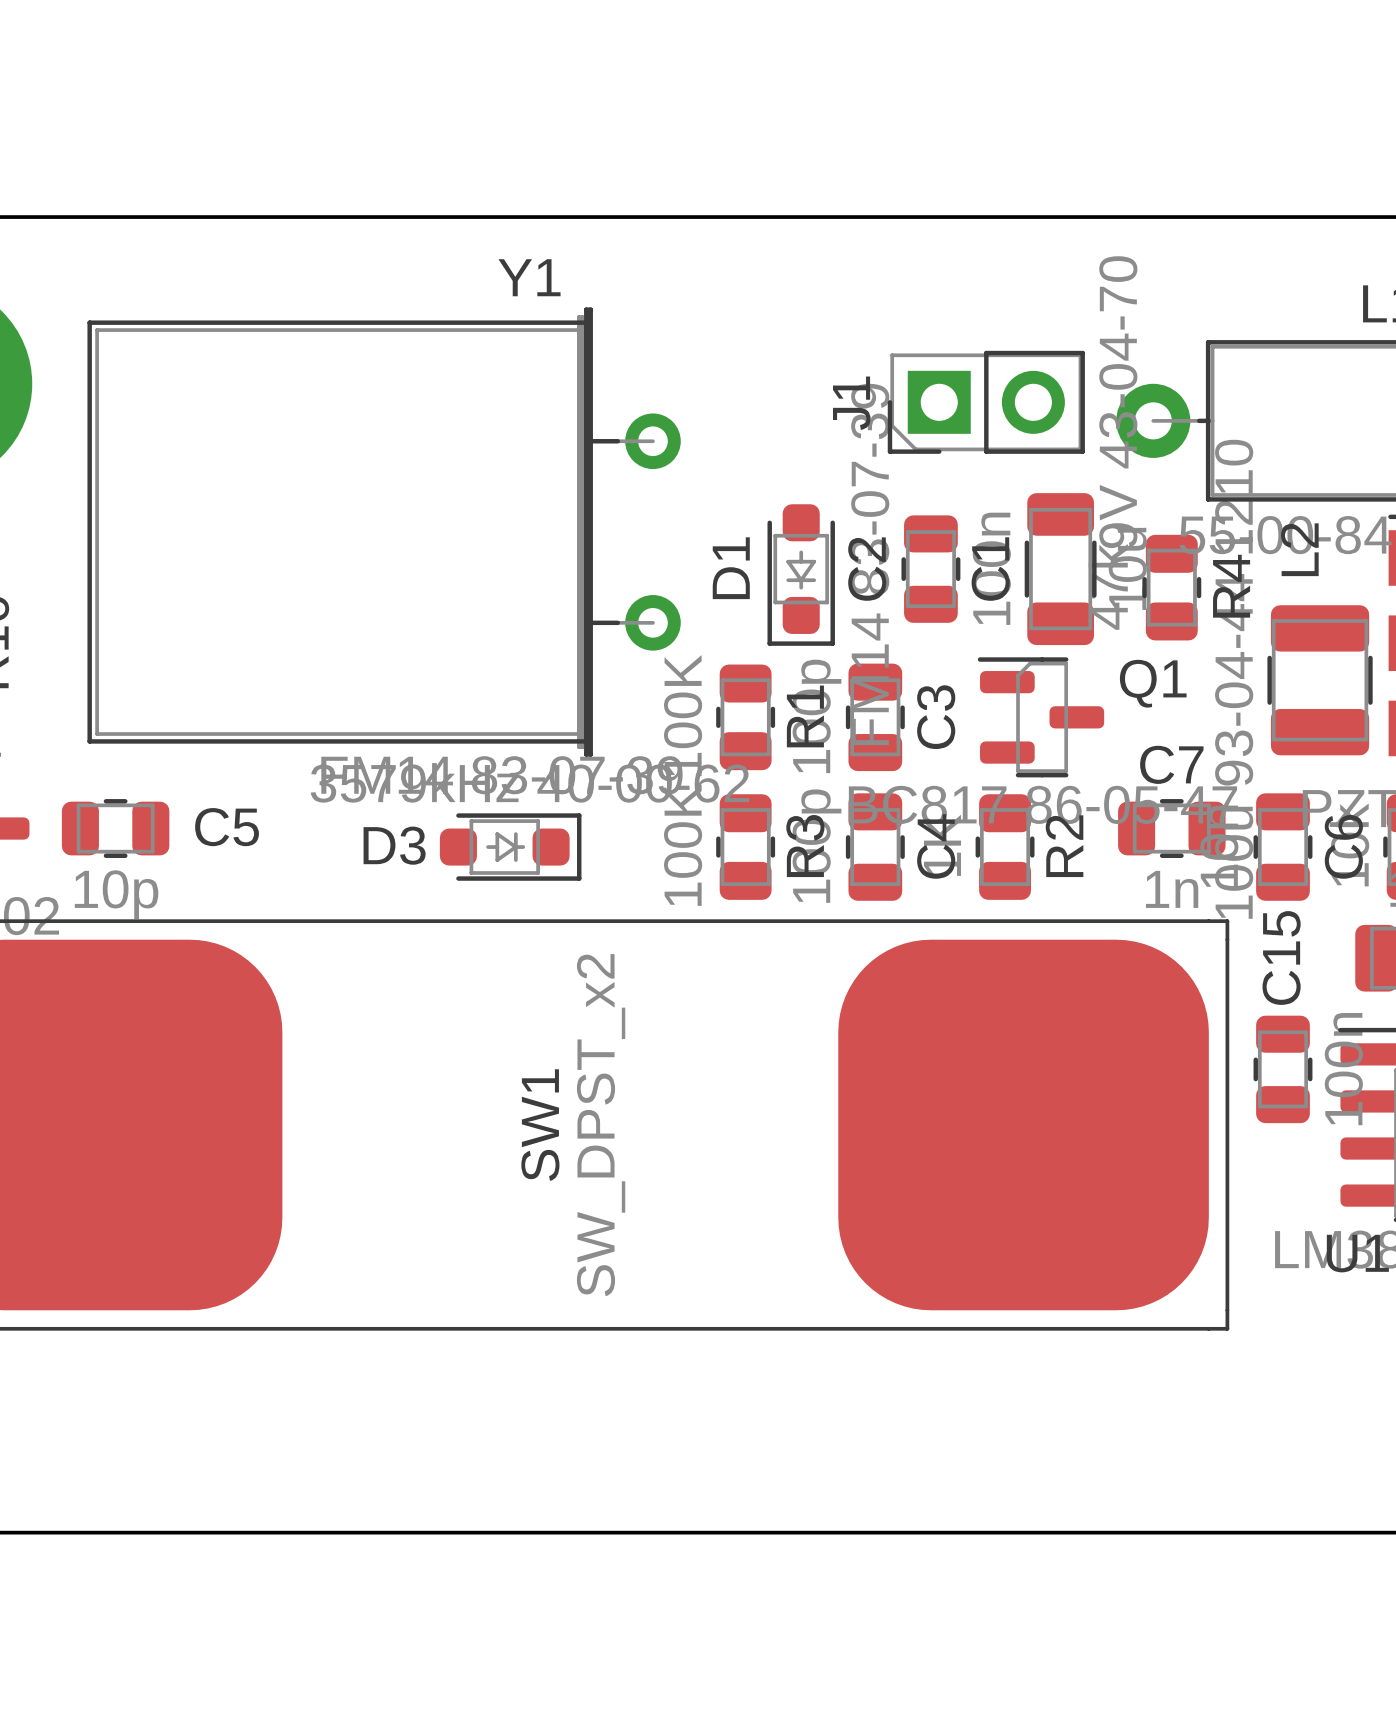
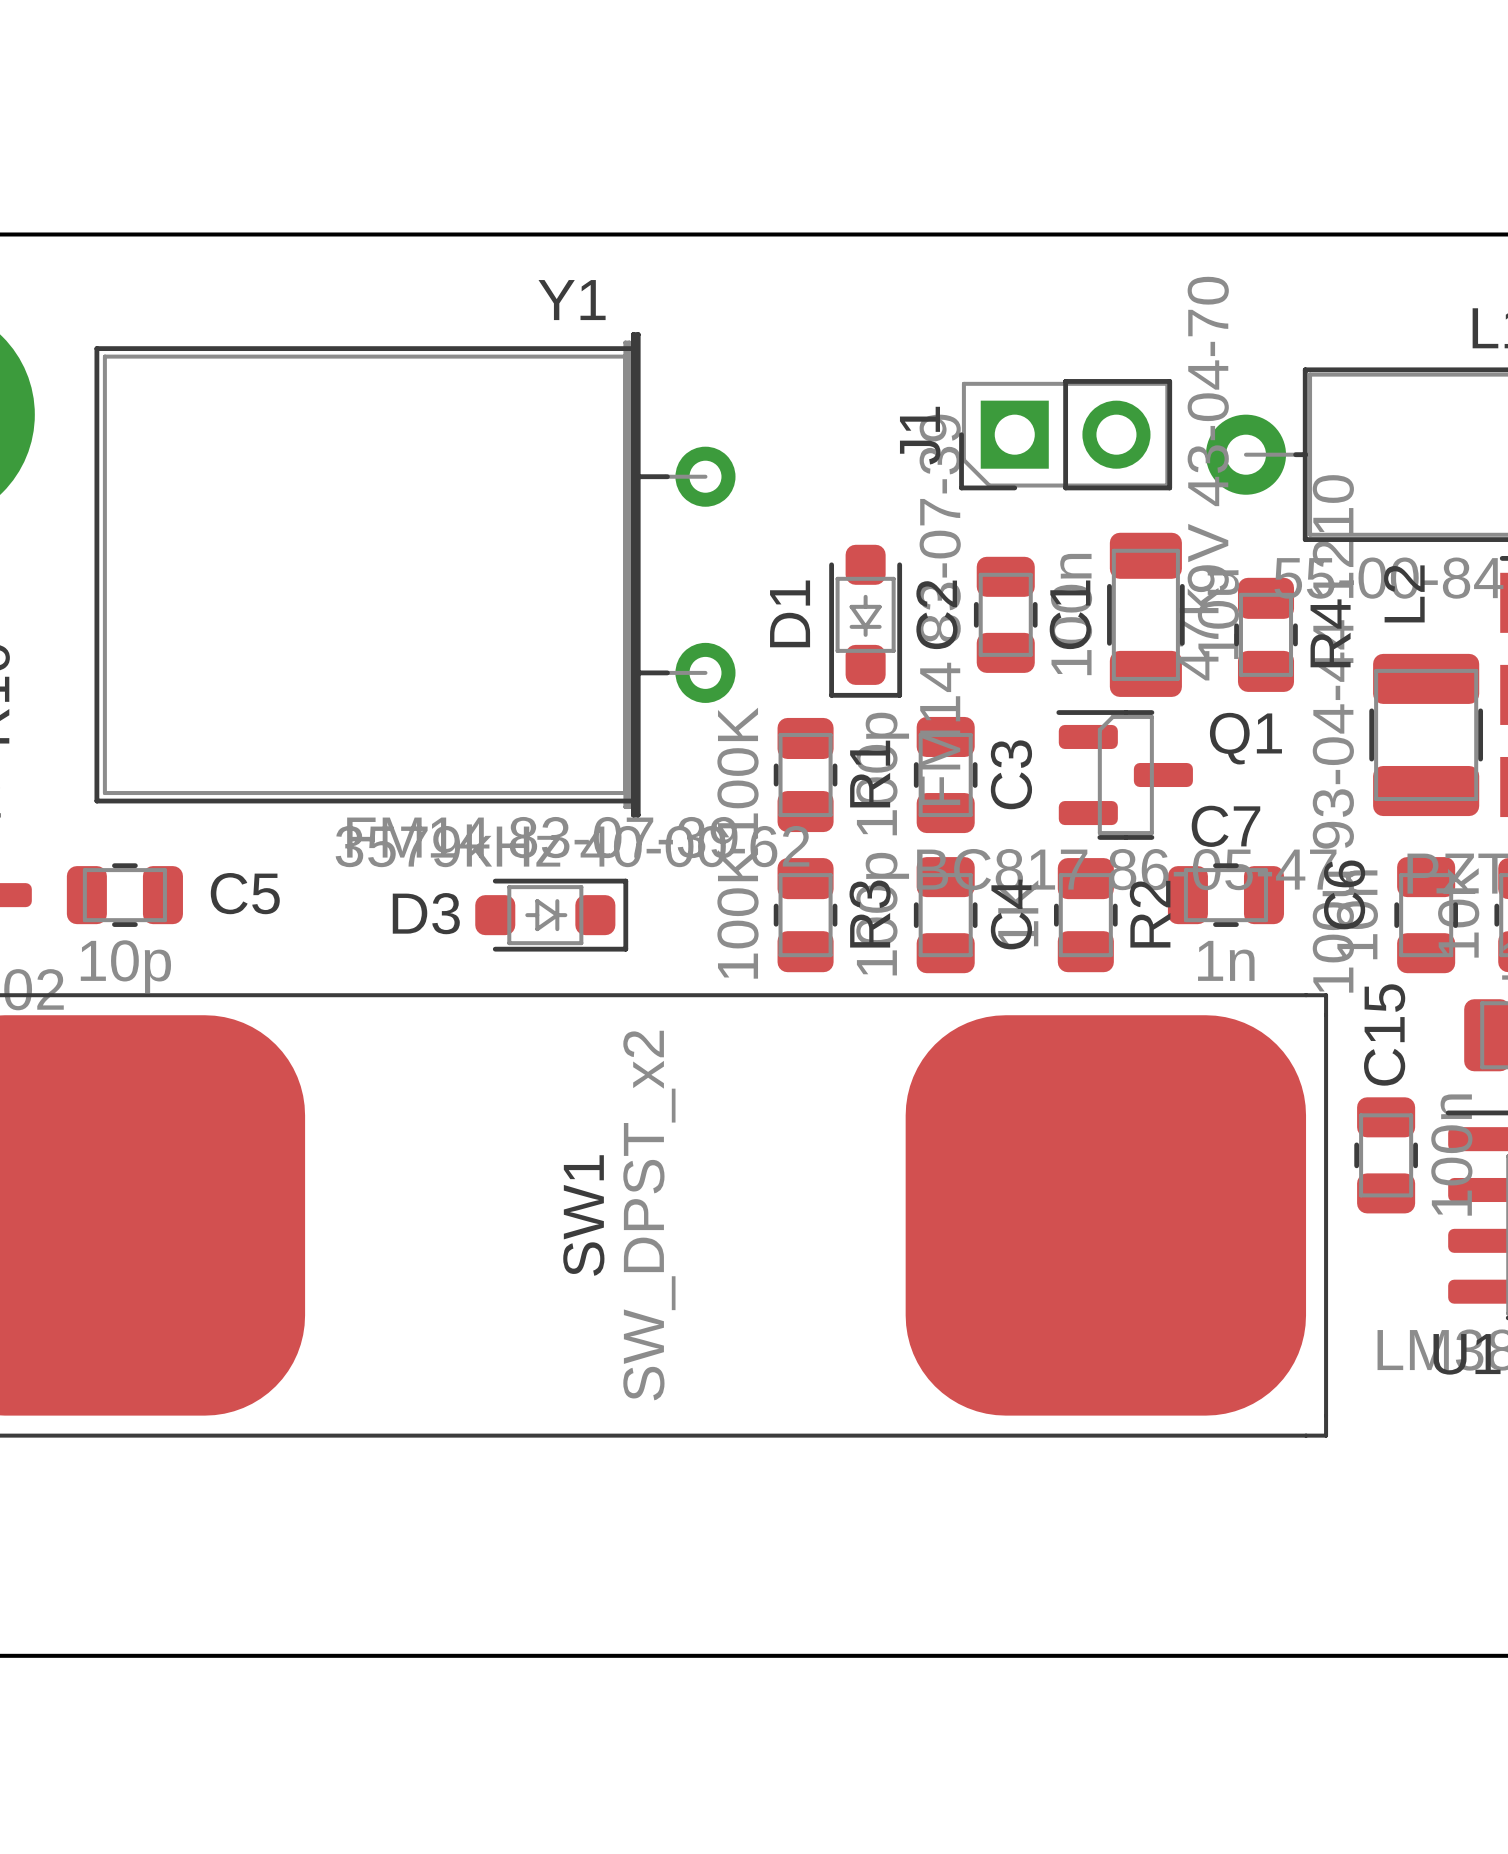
C7 position: (1171, 828) -> (1225, 895)
C6 name position: C6 (1343, 846) -> C6 (1344, 894)
C6 position: (1282, 847) -> (1426, 915)

